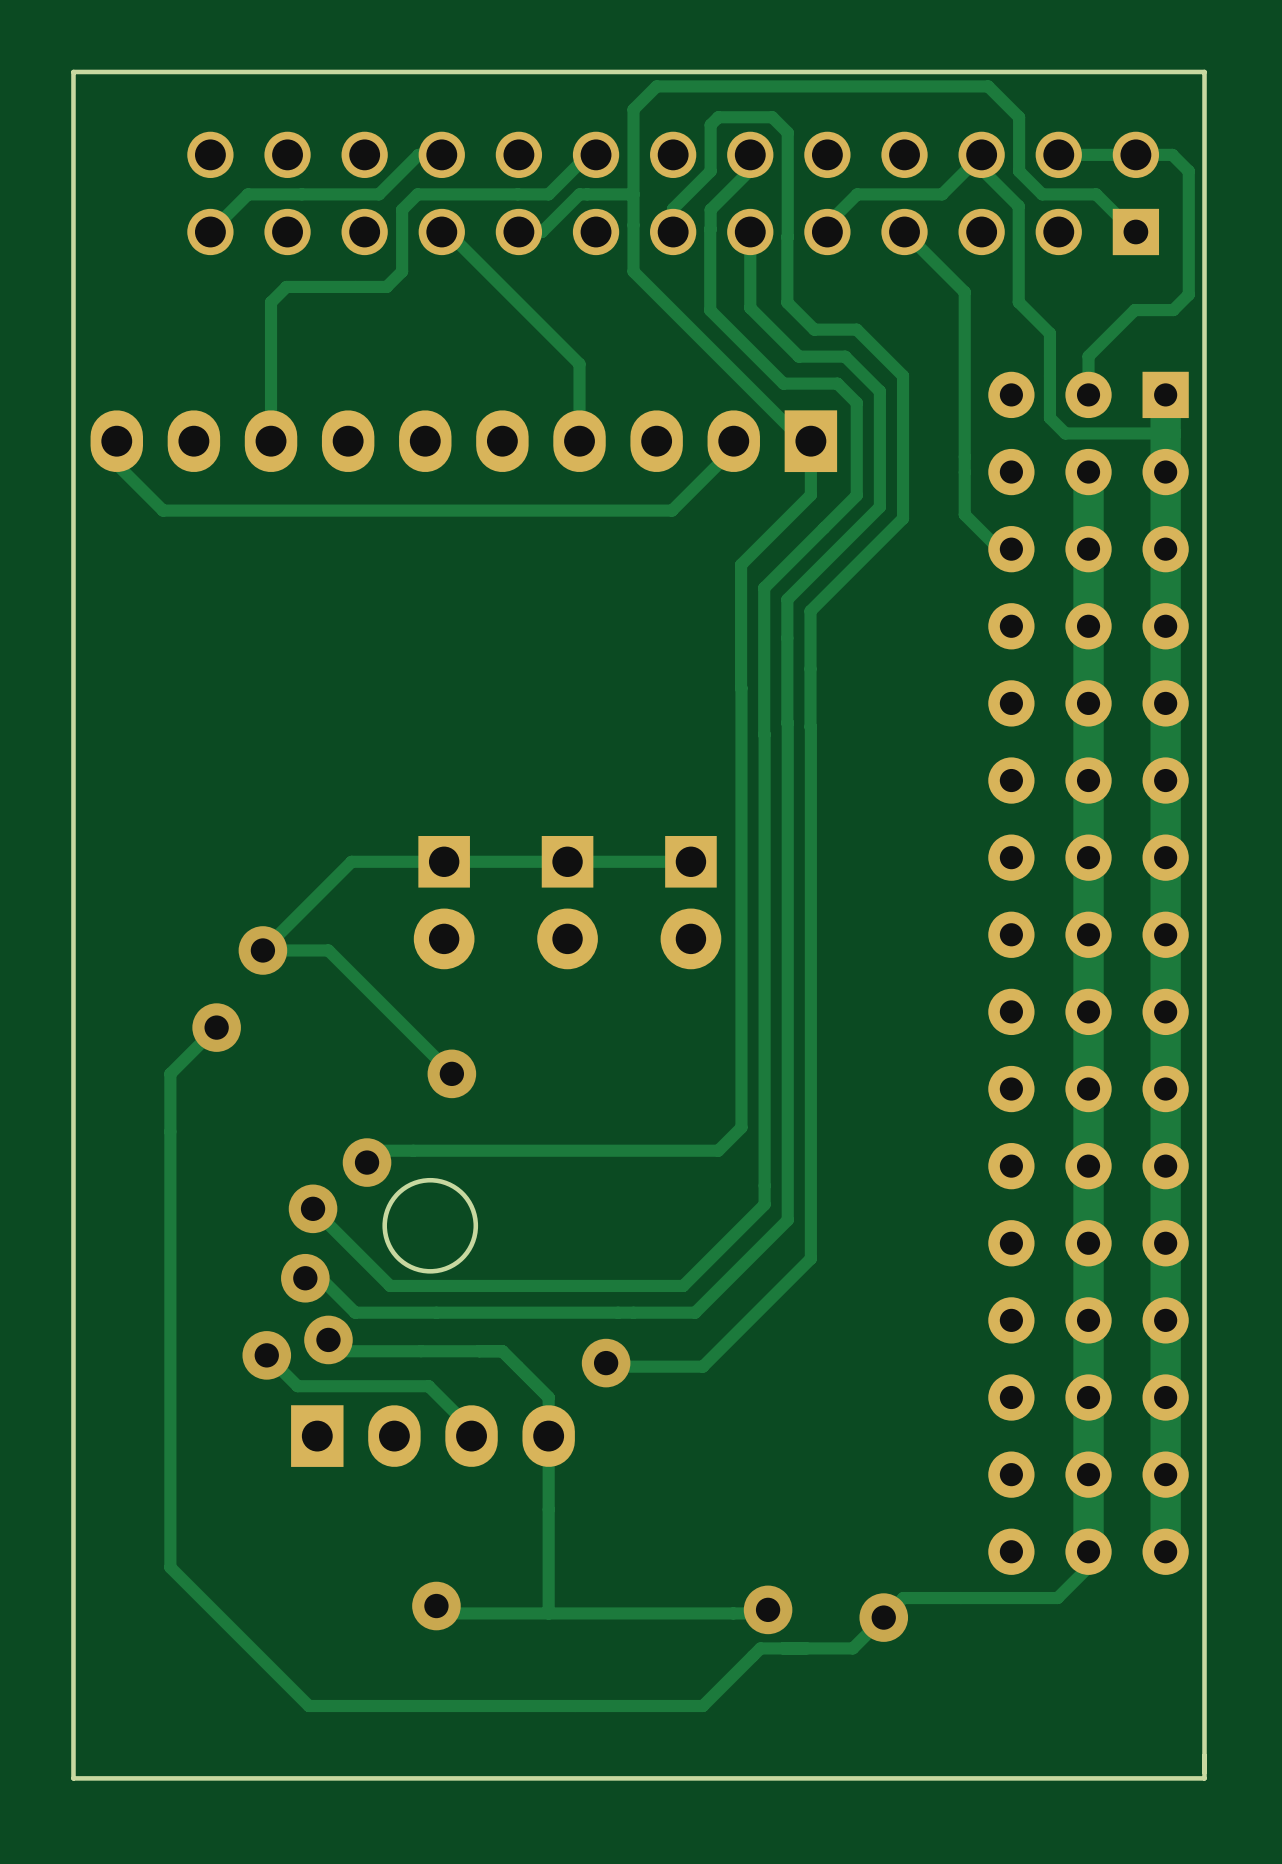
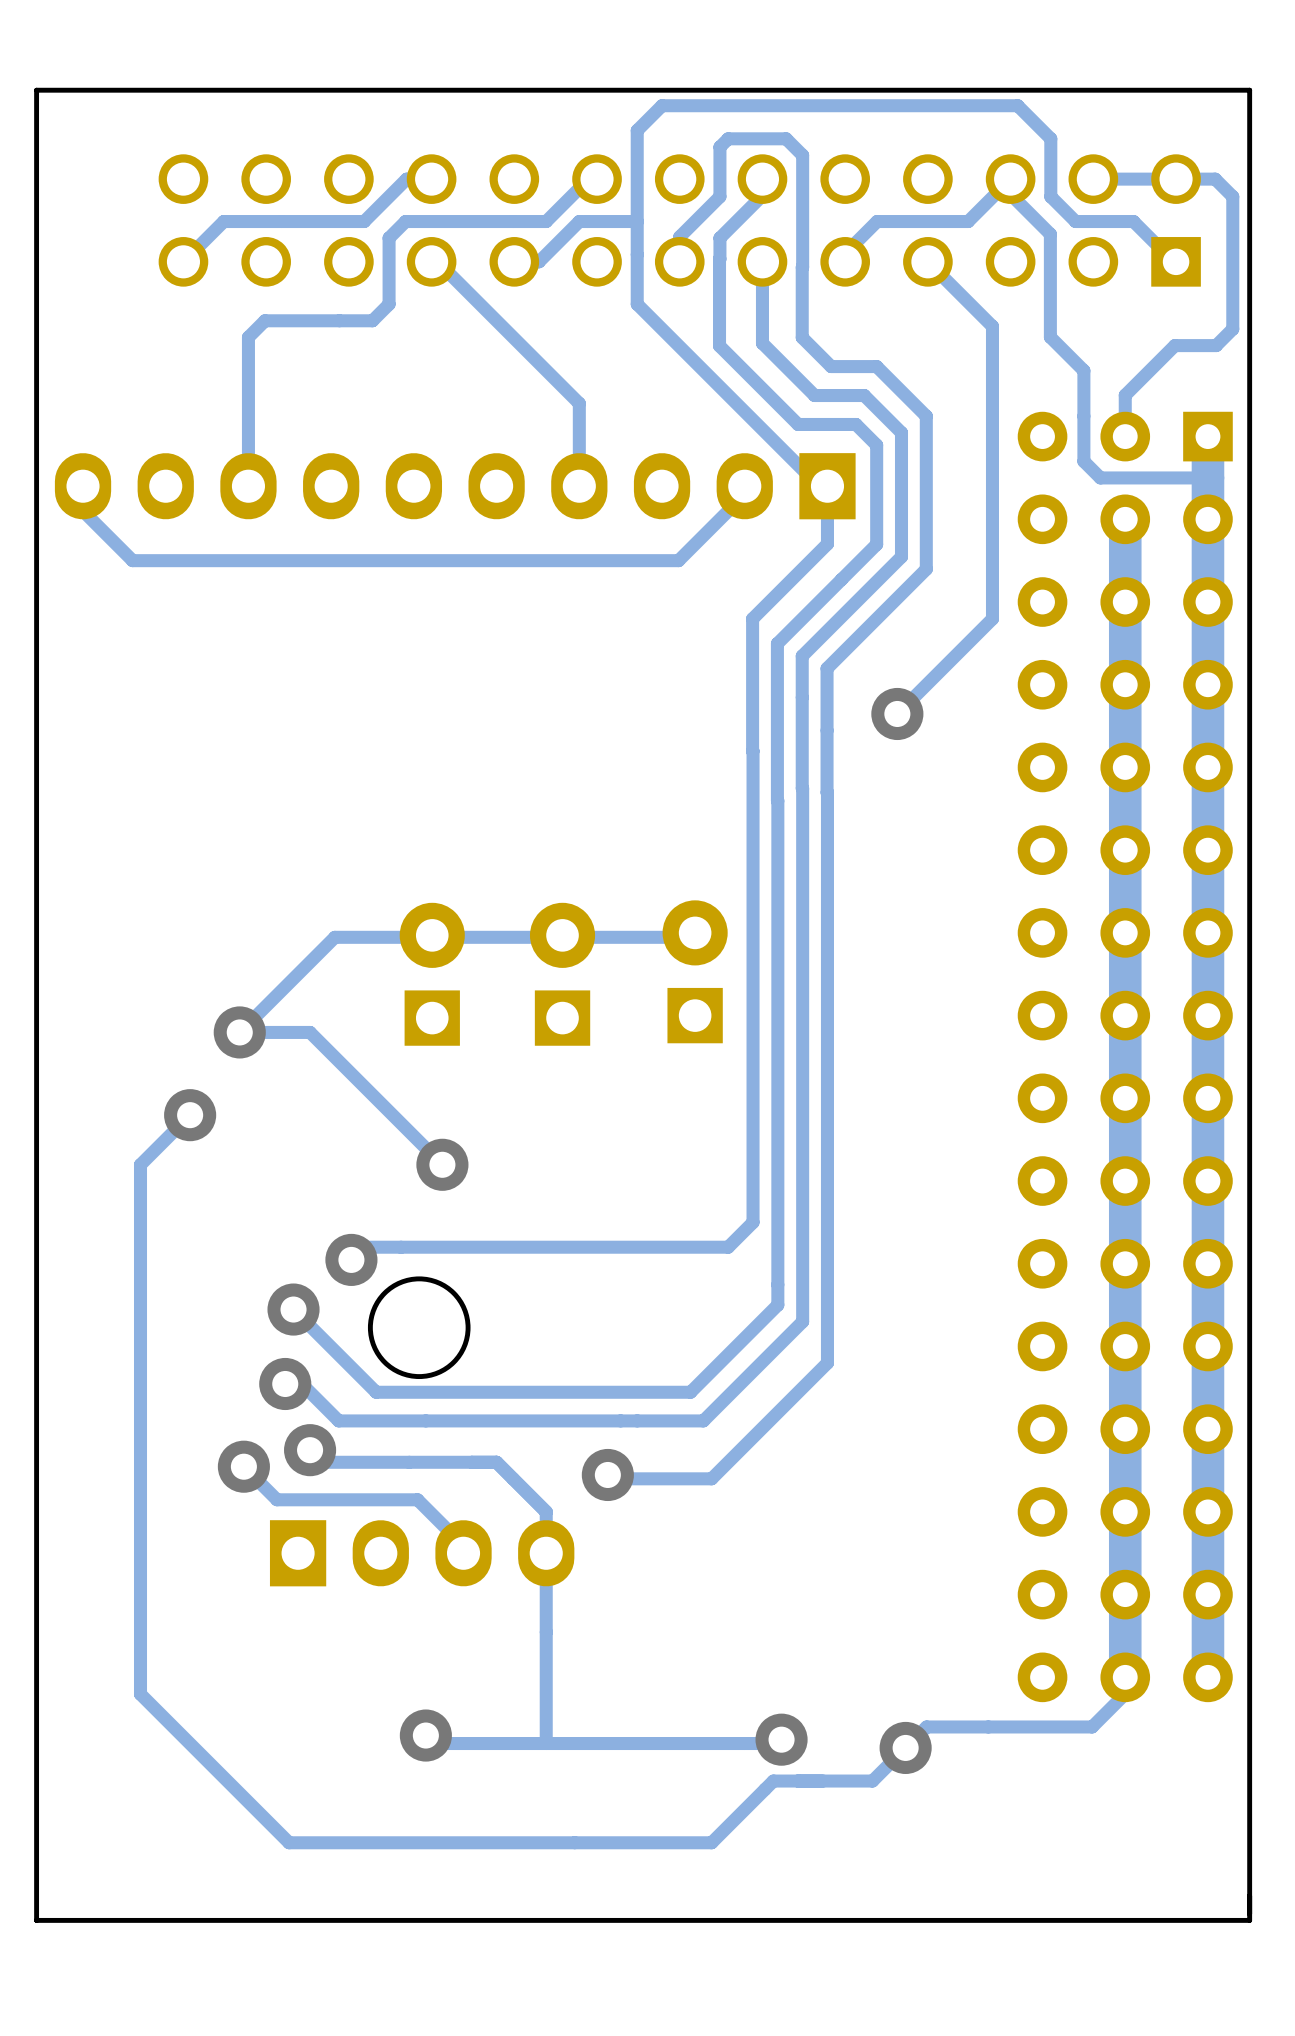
track: (964, 514) (999, 549) (1011, 549) -> (992, 565) (992, 618) (897, 713)
via: none -> (897, 713)
part rotation: 0° (444, 902) -> 180° (432, 974)
part rotation: 0° (567, 902) -> 180° (562, 974)
part rotation: 0° (690, 902) -> 180° (695, 971)

